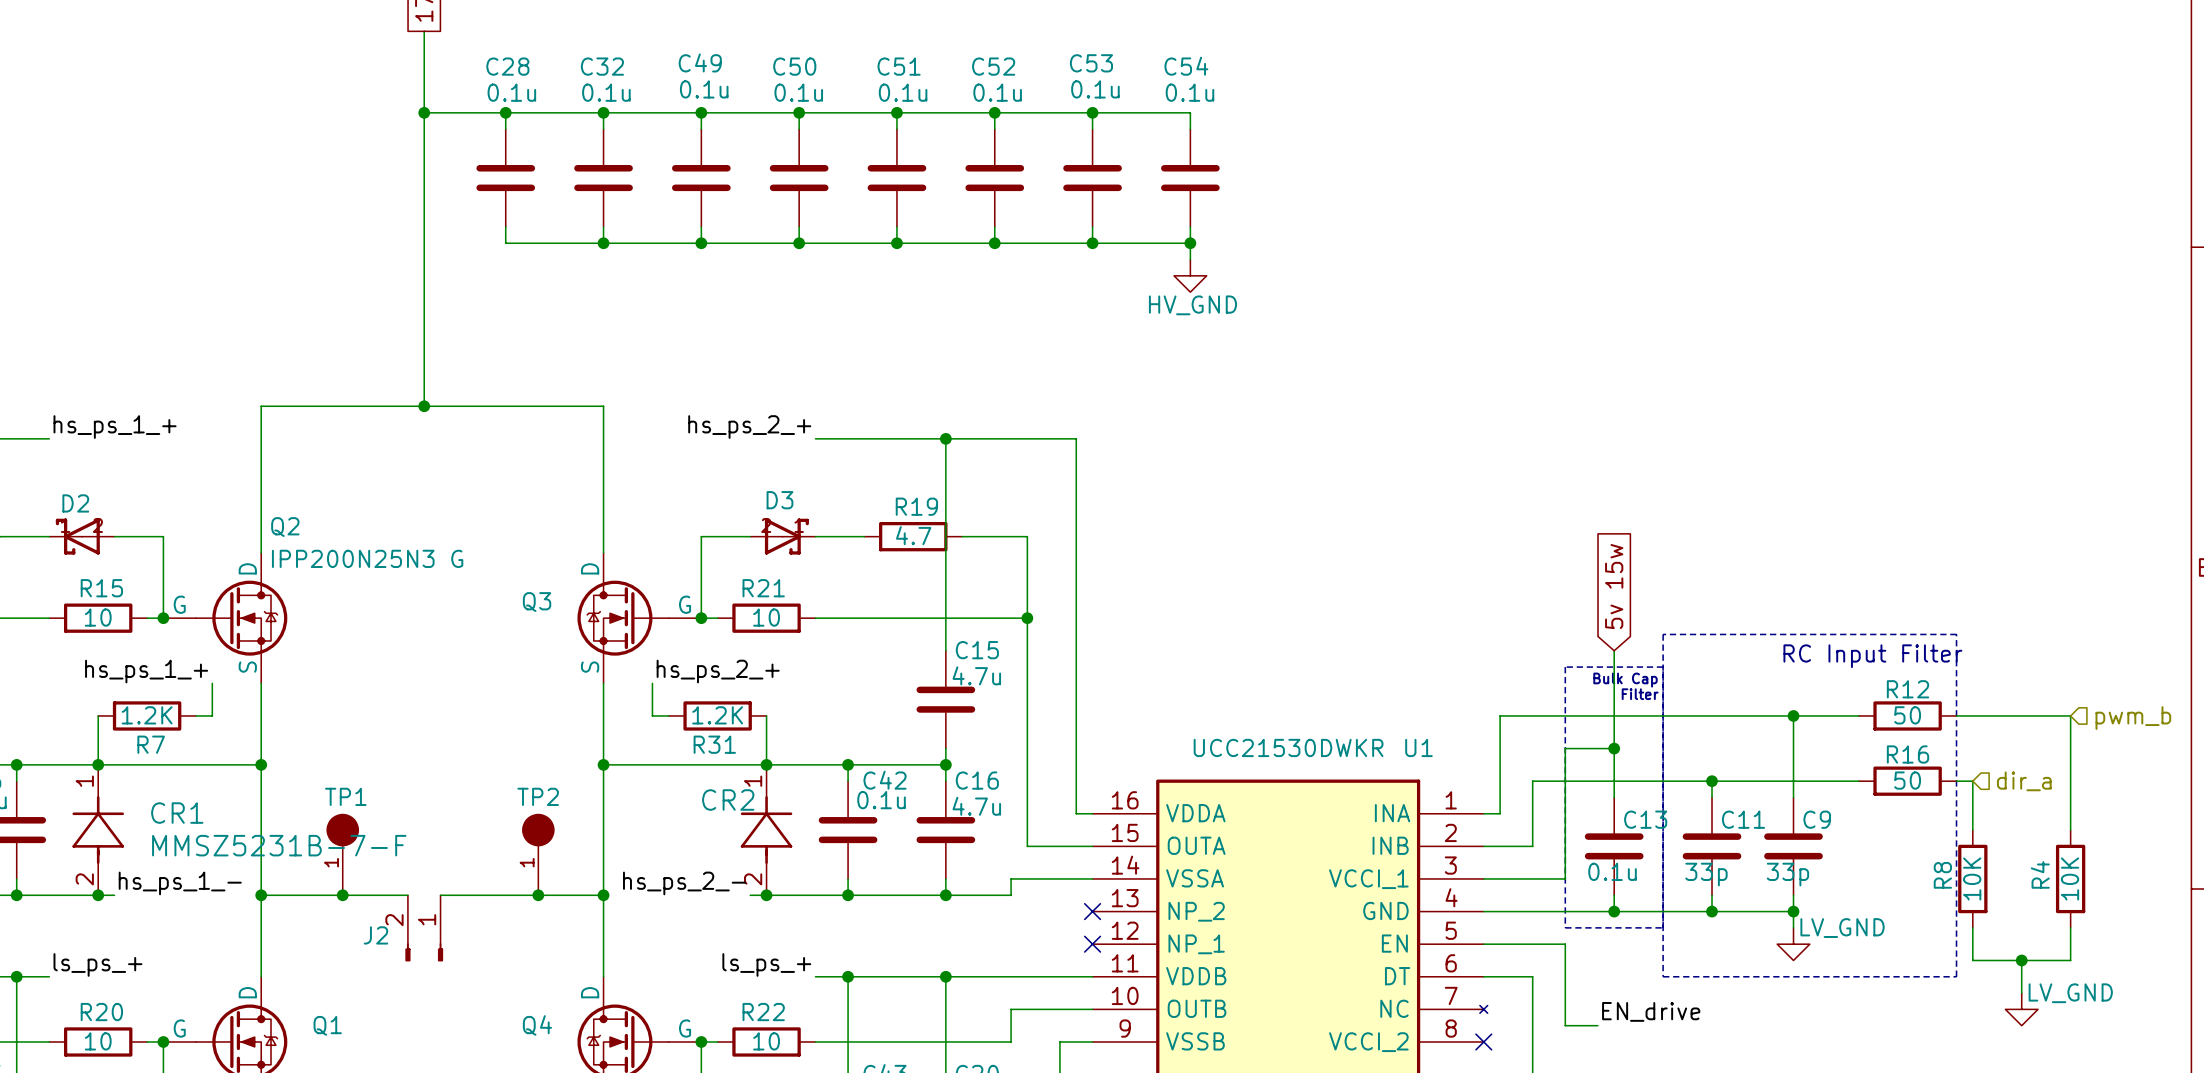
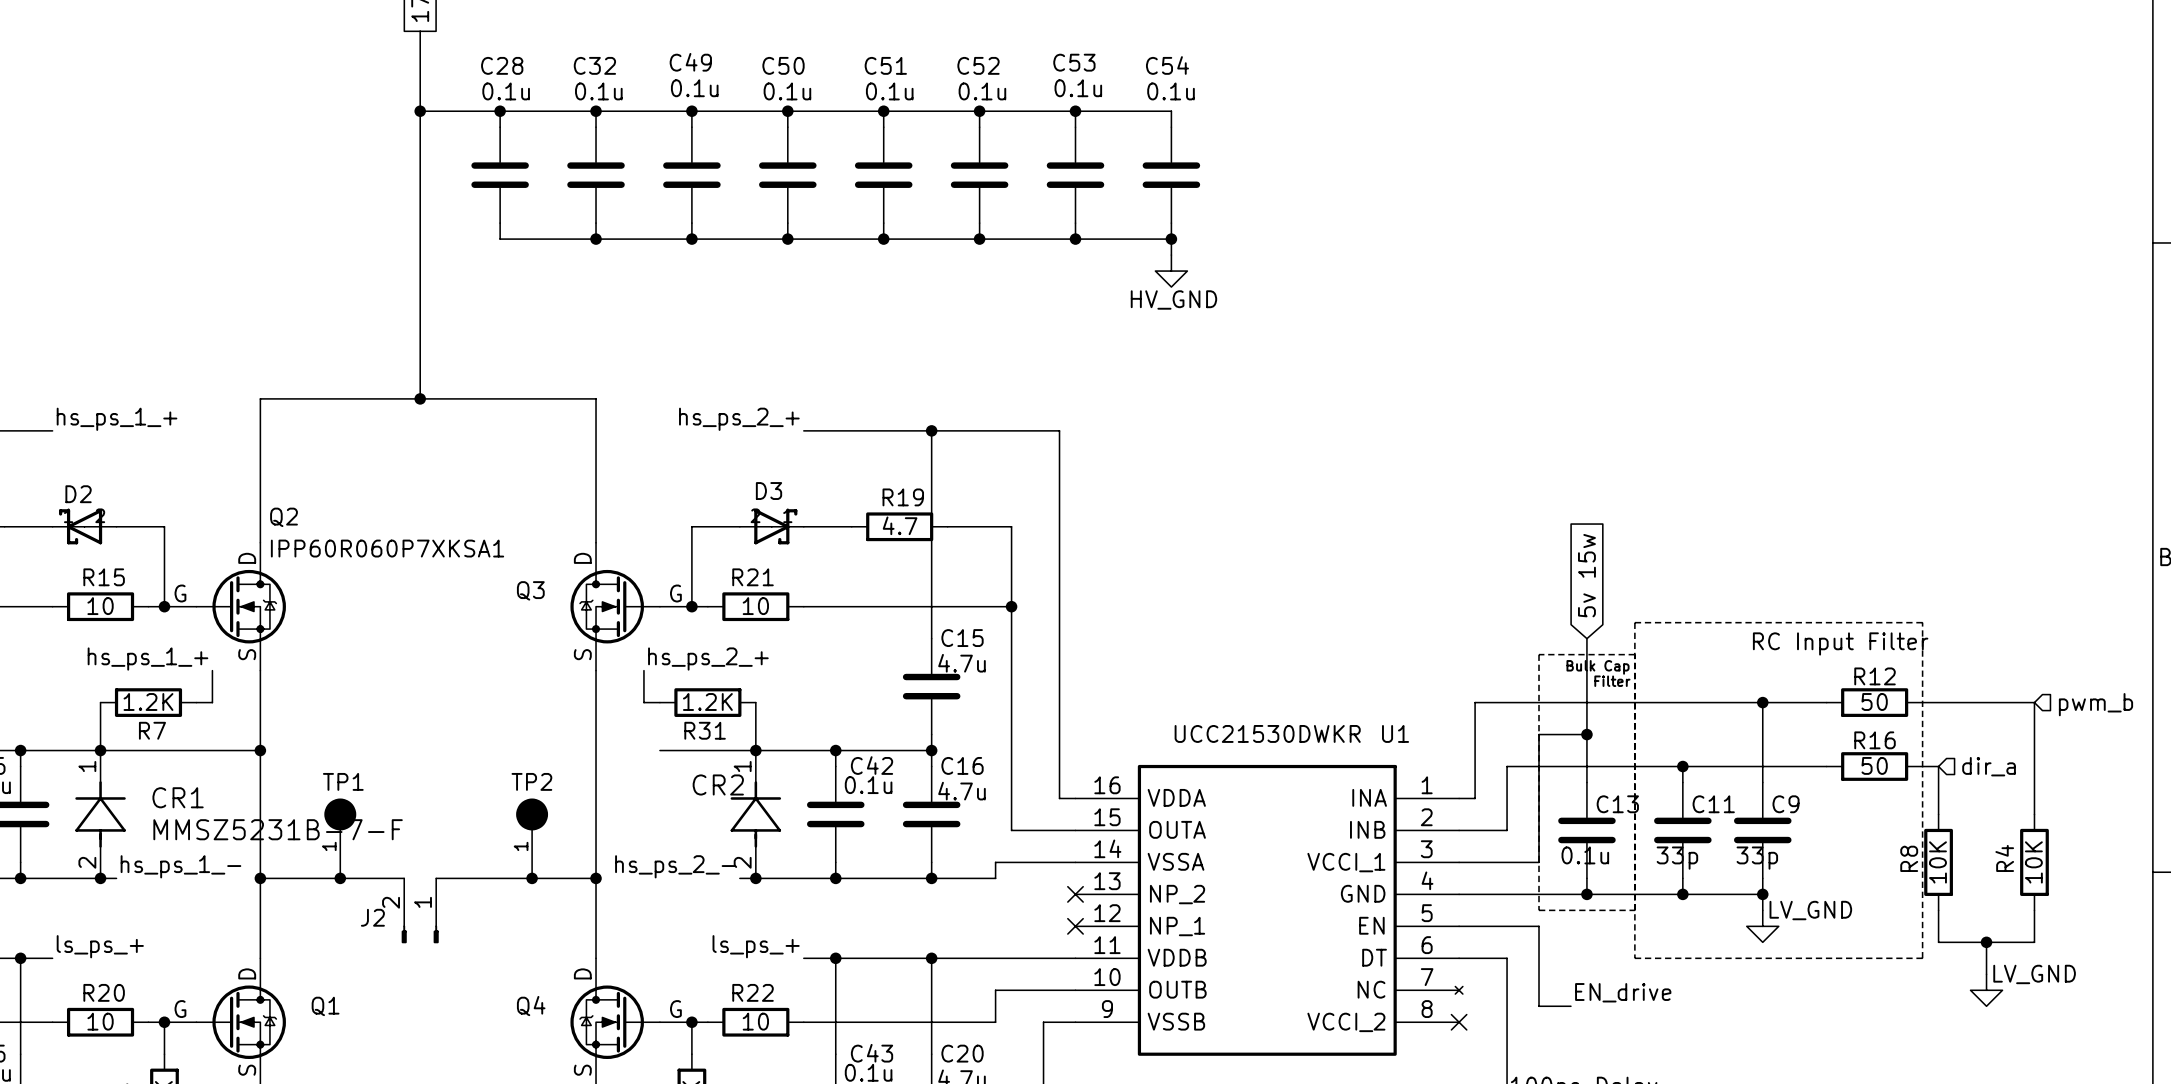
Q2 value: IPP200N25N3 G (367, 558) -> IPP60R060P7XKSA1 (387, 548)
wire: (603, 764) (668, 764) -> none
junction: (603, 764) -> none

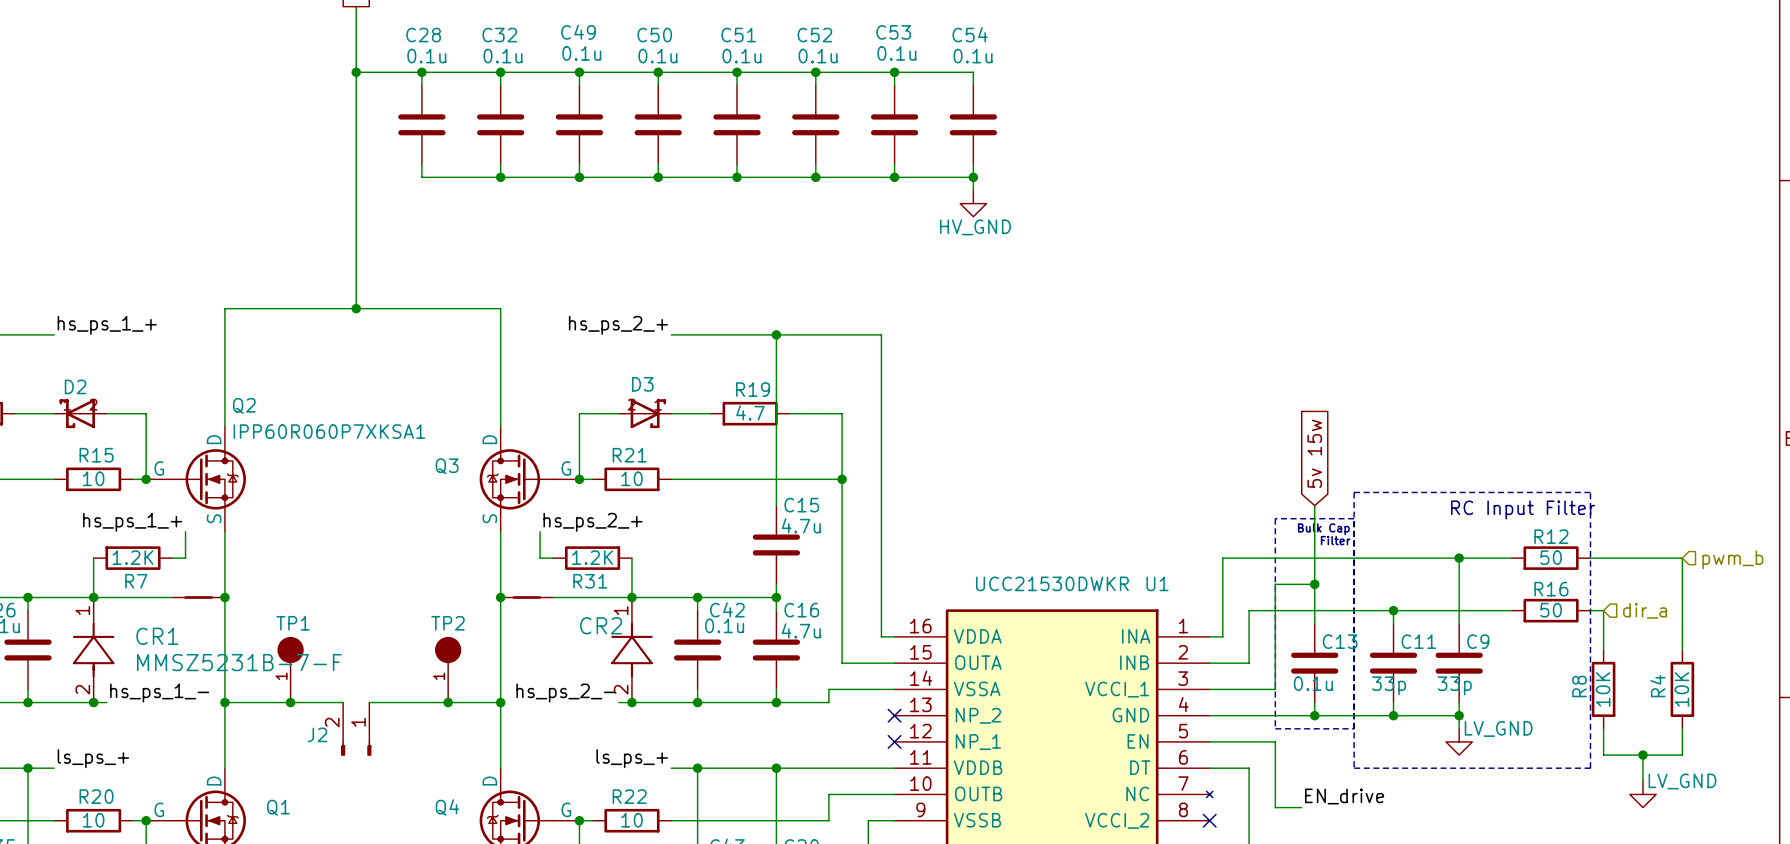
part: none -> (198, 597)
junction: none -> (500, 597)
part: none -> (526, 597)

